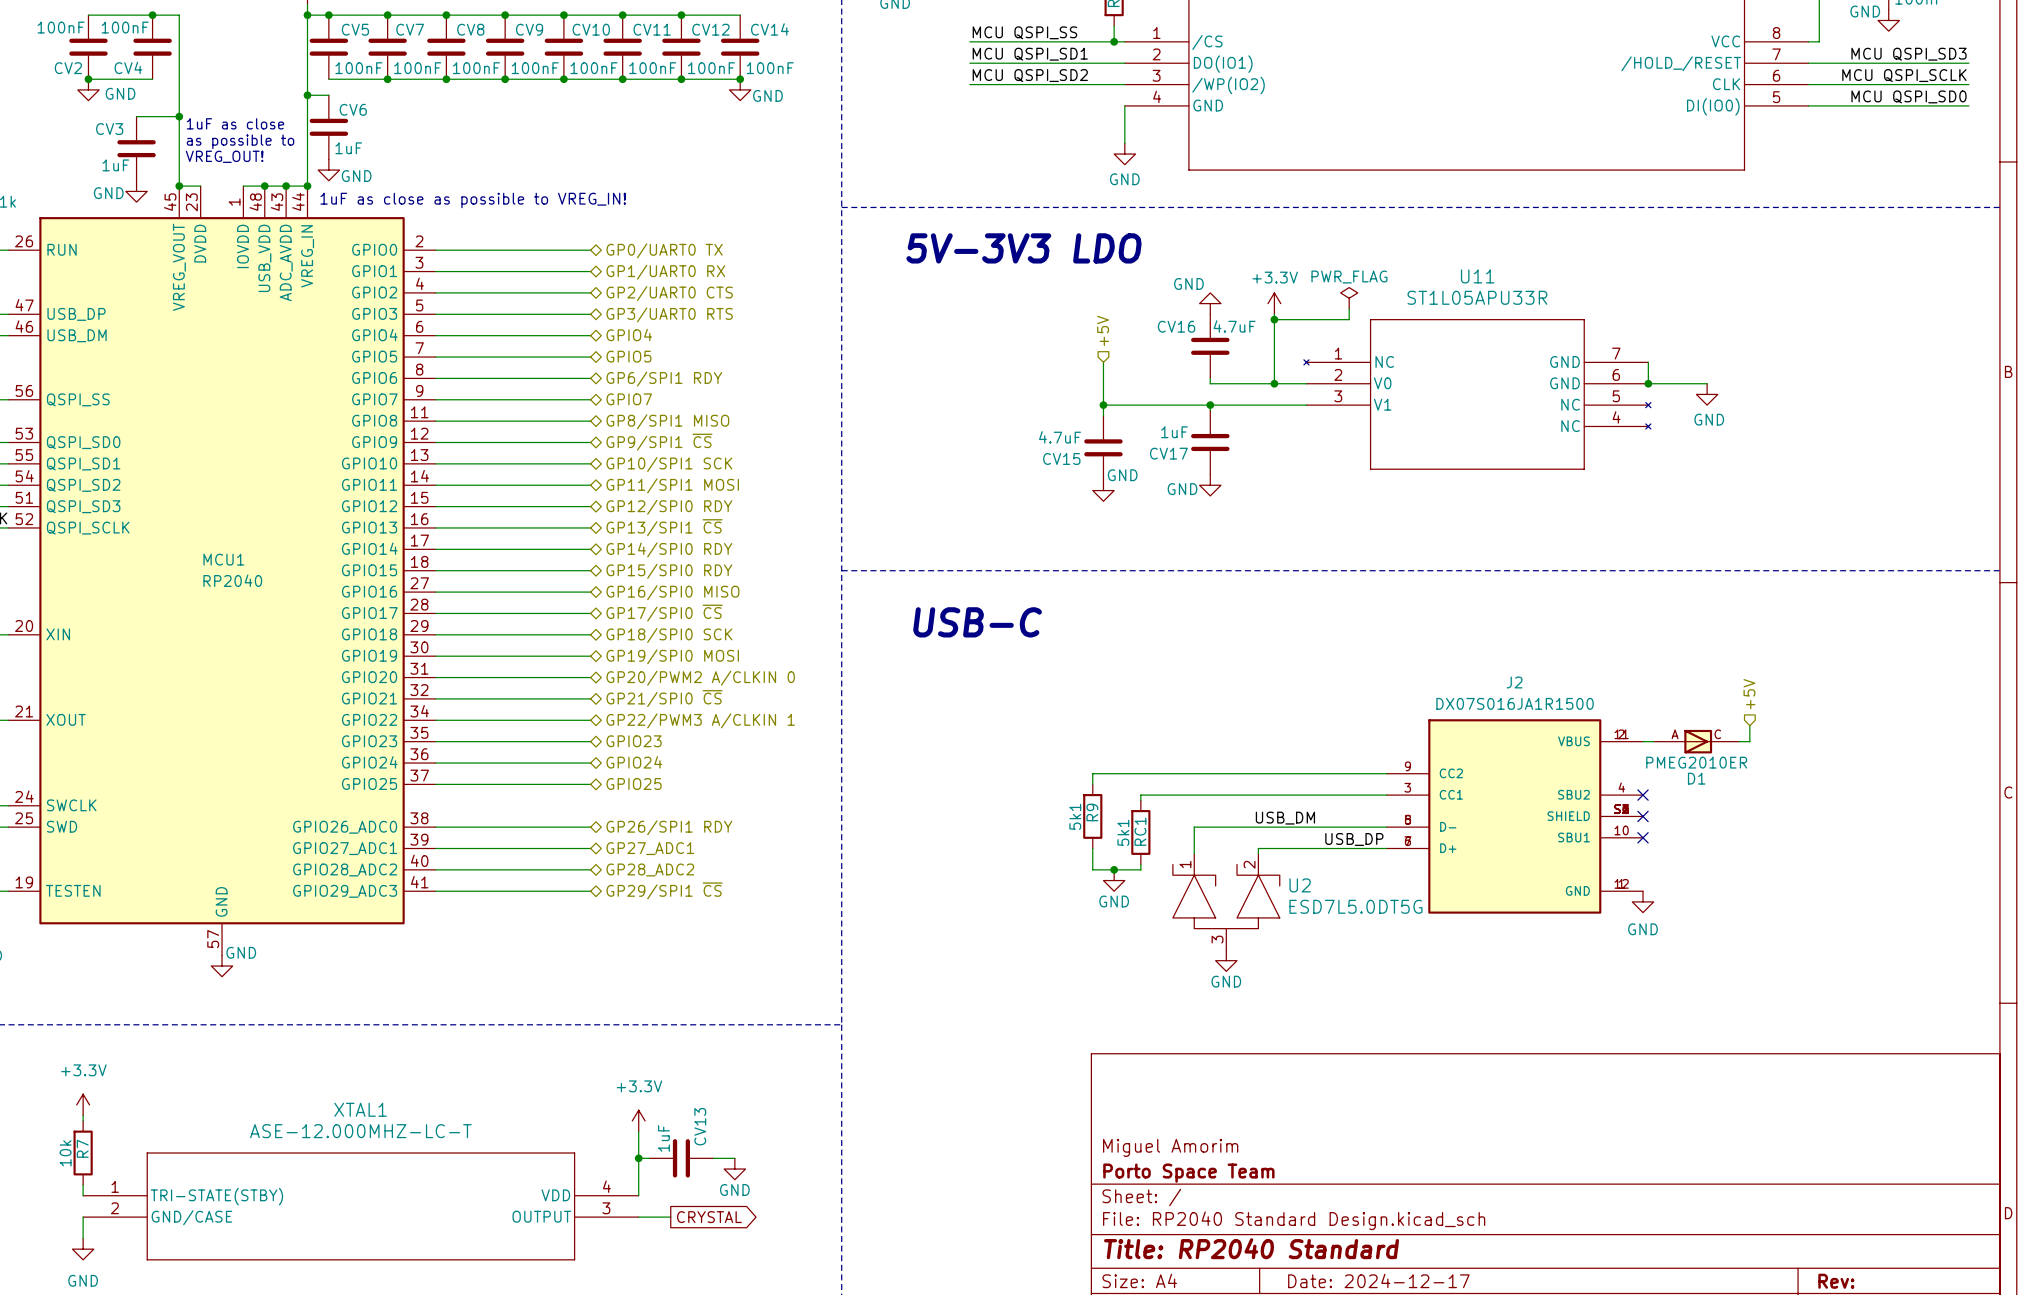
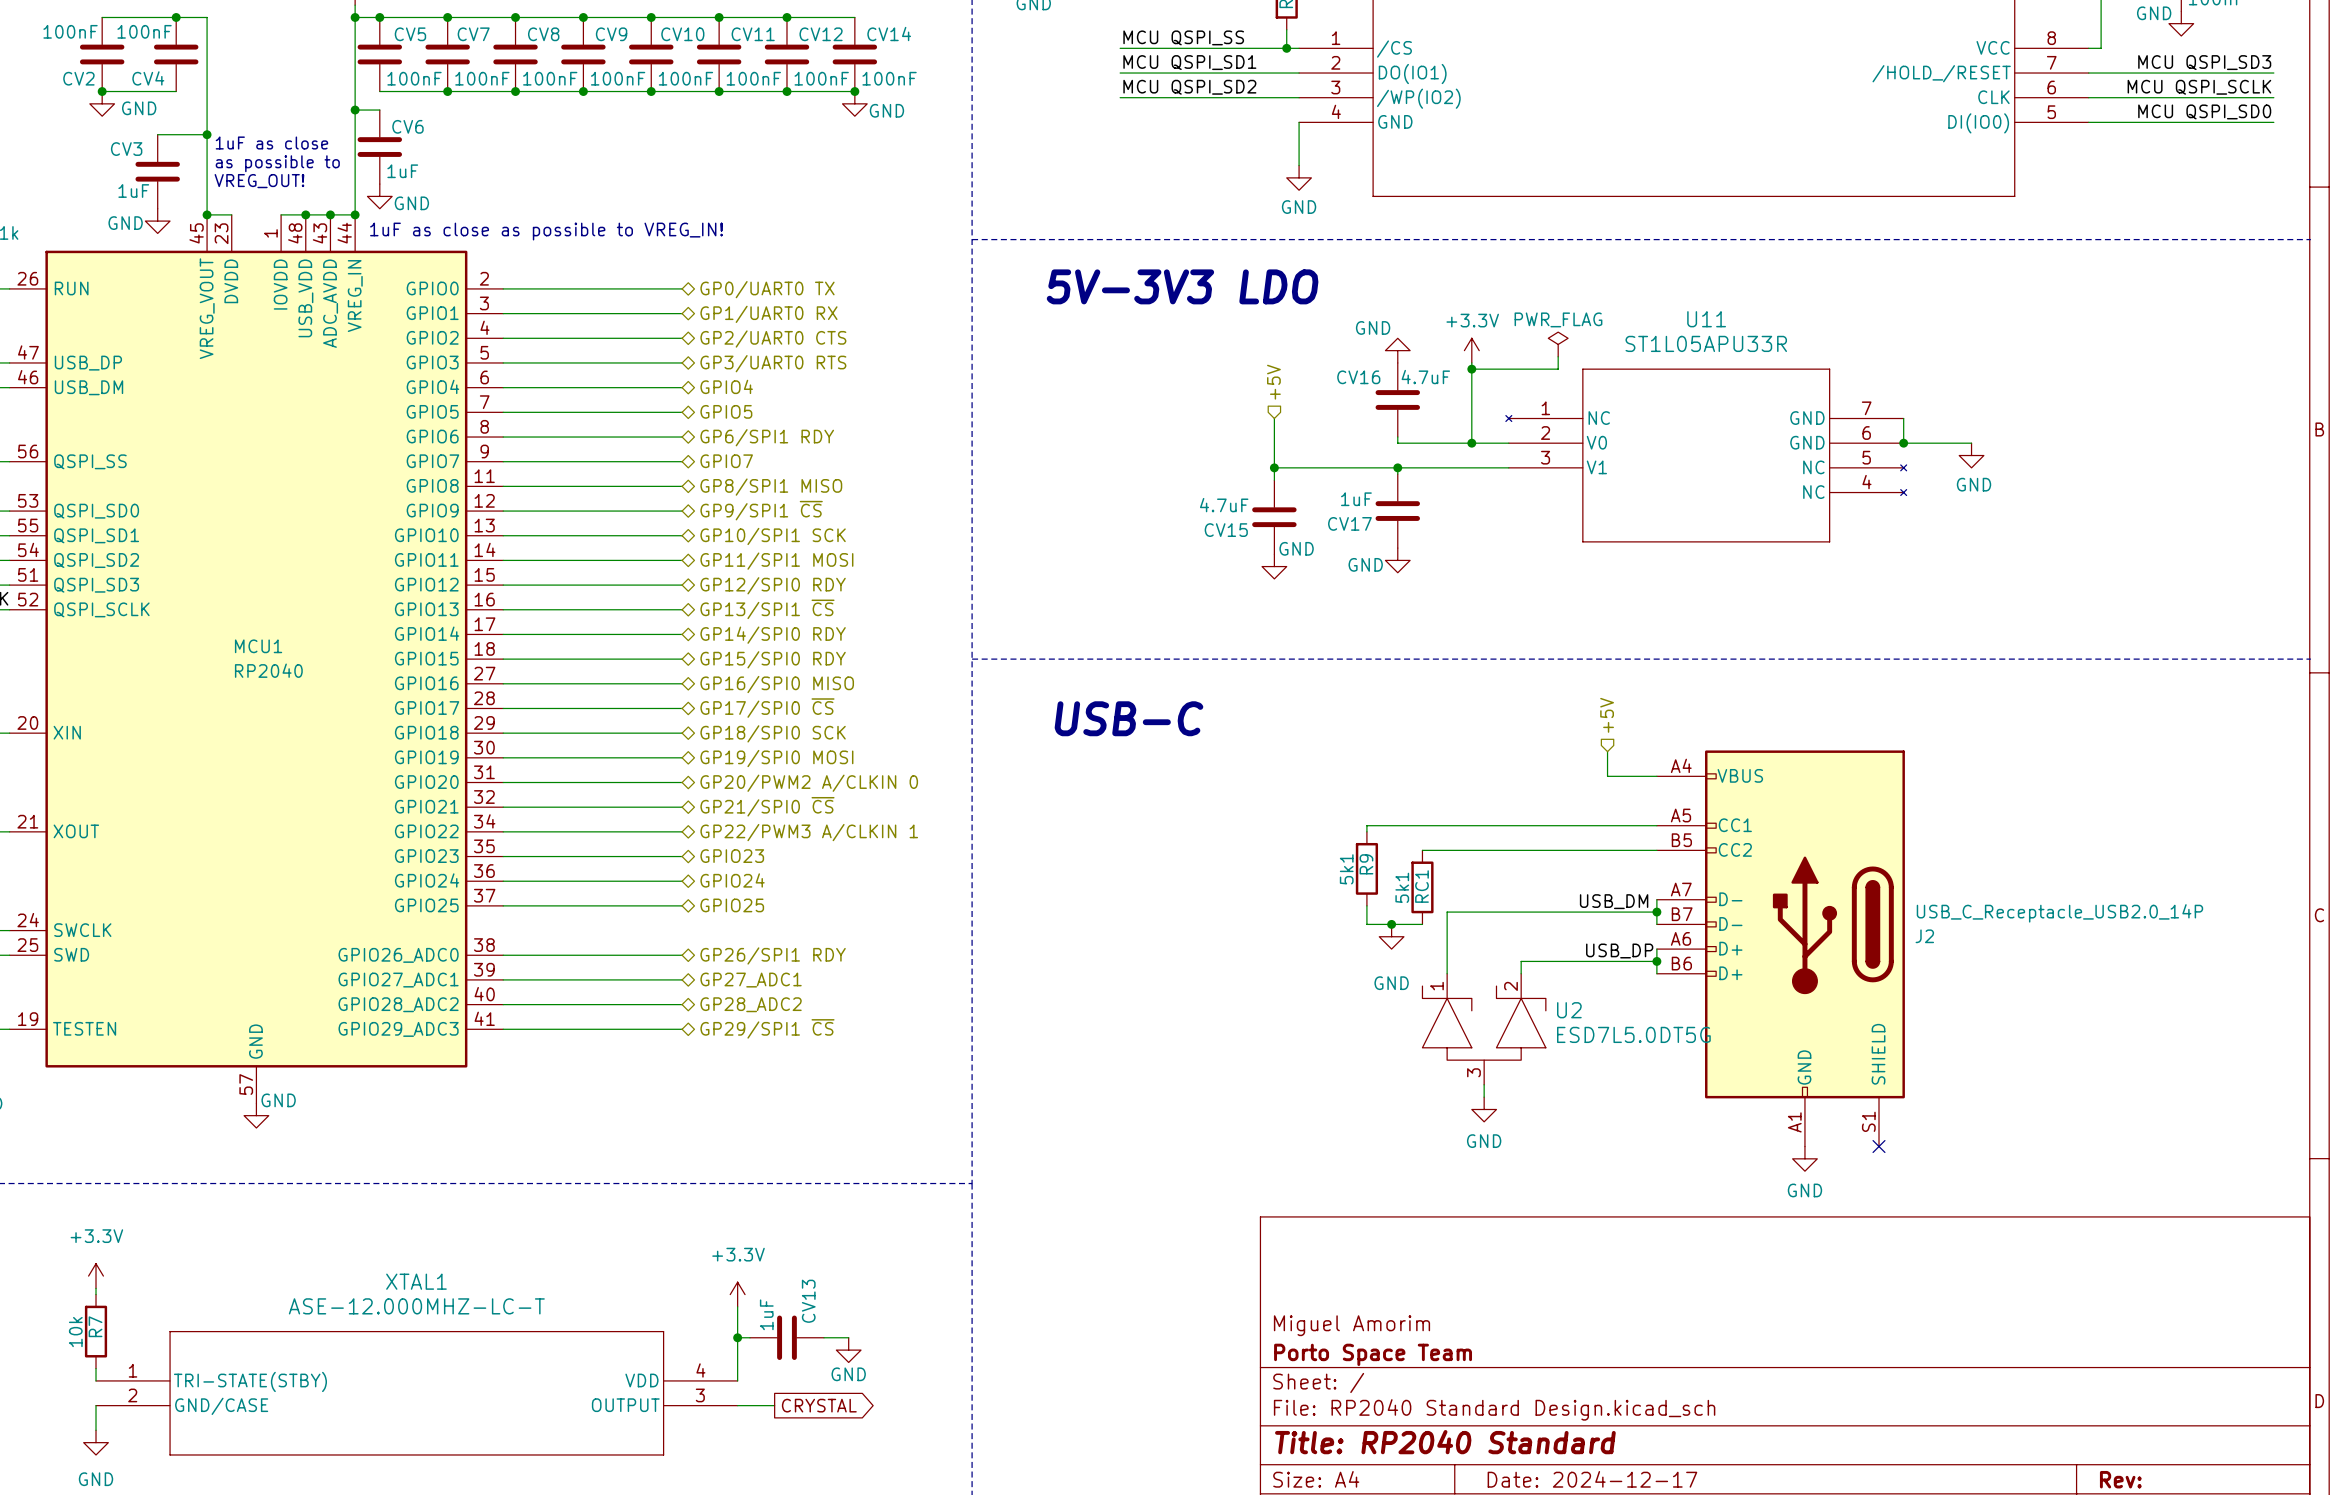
hierarchical label: none -> +5V (1607, 715)
wire: none -> (1607, 751) (1607, 776) (1656, 776)
J2 name position: J2 (1514, 682) -> J2 (1924, 936)
hierarchical label: +5V (1749, 694) -> none
J2 value: DX07S016JA1R1500 (1515, 703) -> USB_C_Receptacle_USB2.0_14P (2059, 913)
wire: none -> (1656, 825) (1366, 825) (1366, 831)
J2 symbol: [1386, 719, 1644, 914] -> [1656, 750, 1905, 1147]
wire: (1749, 725) (1749, 741) (1739, 741) -> none
wire: none -> (1422, 850) (1656, 850)
D1: PMEG2010ER (1696, 741) -> none
wire: (1386, 773) (1092, 773) (1092, 784) -> none
wire: none -> (1366, 905) (1366, 924) (1422, 924)
wire: none -> (1656, 912) (1447, 912) (1447, 973)
junction: none -> (1656, 912)
wire: (1386, 795) (1140, 795) (1140, 800) -> none
no-connect mark: (1643, 795) -> none
junction: none -> (1391, 924)
power symbol: none -> GND (1391, 936)
R9 position: (1092, 816) -> (1366, 868)
no-connect mark: (1643, 816) -> none
label position: USB_DM (1285, 818) -> USB_DM (1614, 901)
wire: (1386, 827) (1194, 827) (1194, 853) -> none
RC1 position: (1140, 832) -> (1422, 887)
wire: none -> (1656, 961) (1521, 961) (1521, 973)
junction: none -> (1656, 961)
no-connect mark: (1643, 837) -> none
label position: USB_DP (1354, 839) -> USB_DP (1619, 951)
wire: (1092, 848) (1092, 869) (1140, 869) (1140, 864) -> none
wire: (1386, 848) (1258, 848) (1258, 853) -> none
junction: (1114, 869) -> none
power symbol: GND (1114, 880) -> none
U2 position: (1226, 901) -> (1484, 1029)
power symbol position: GND (1643, 901) -> GND (1804, 1158)
wire: none -> (1484, 1084) (1484, 1097)
power symbol position: GND (1226, 960) -> GND (1484, 1109)
power symbol text position: GND (1226, 981) -> GND (1484, 1141)
no-connect mark: none -> (1879, 1146)

